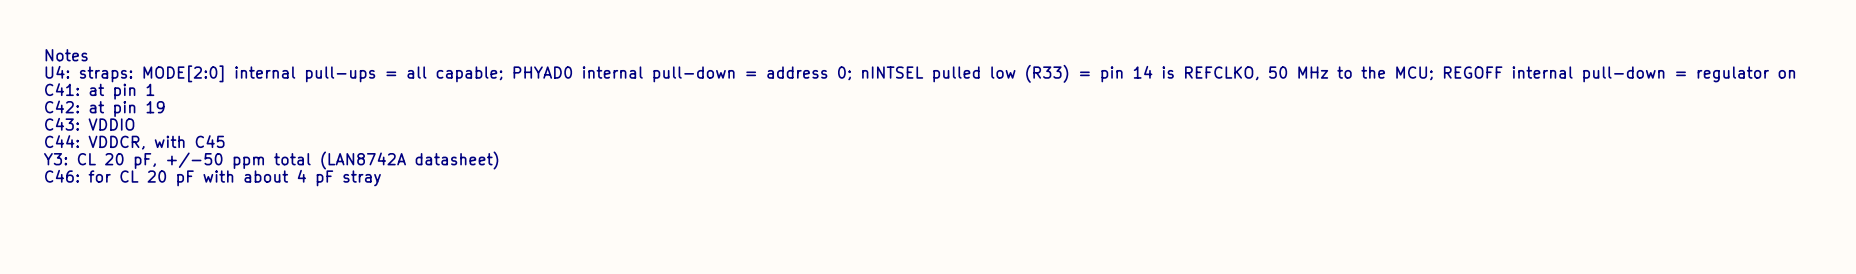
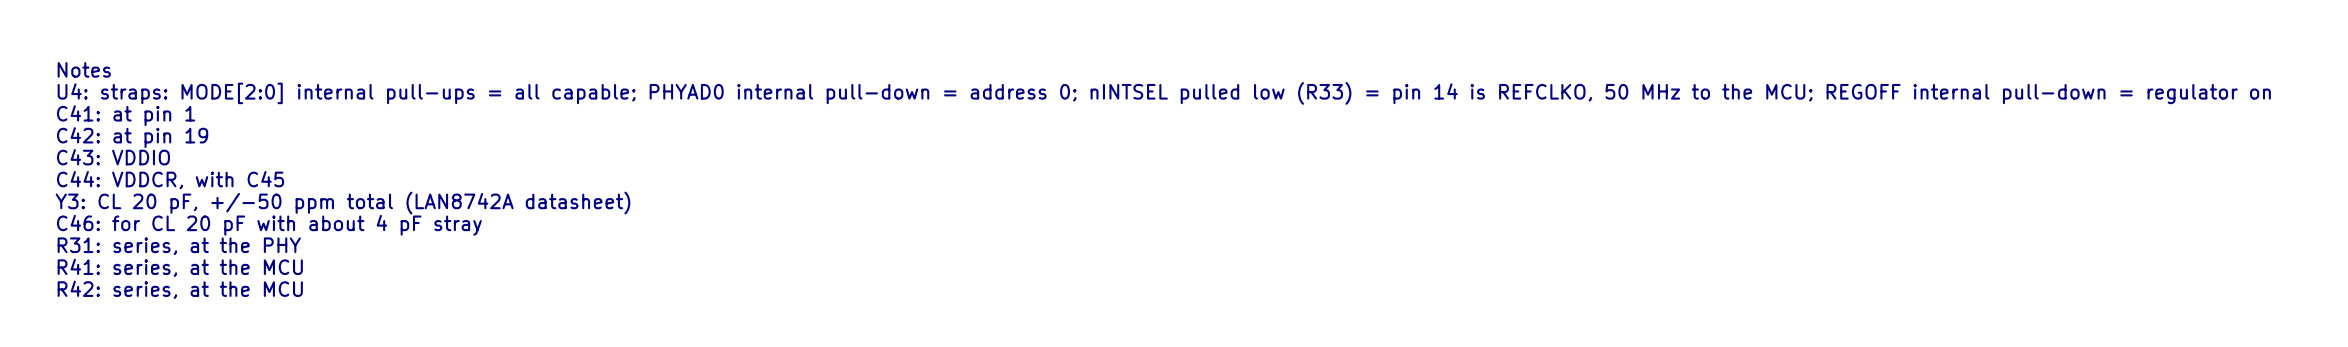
text: none -> R31: series, at the PHY (179, 246)
text: none -> R41: series, at the MCU (180, 267)
text: none -> R42: series, at the MCU (180, 289)

